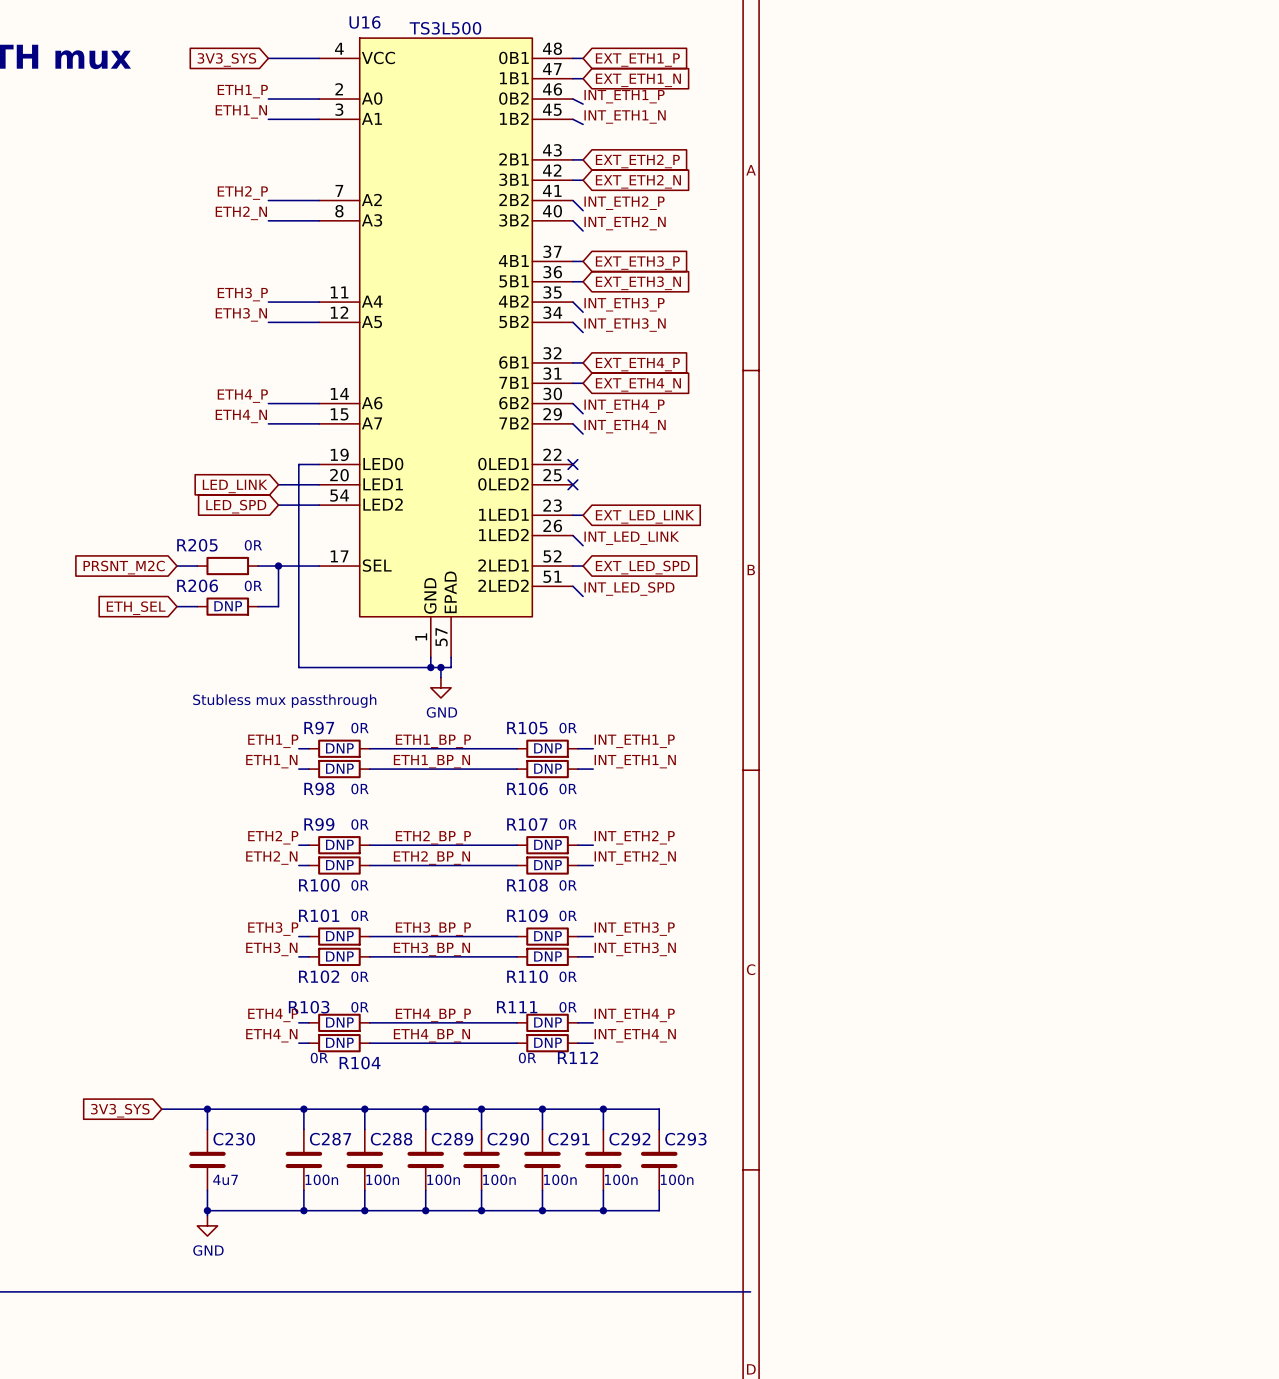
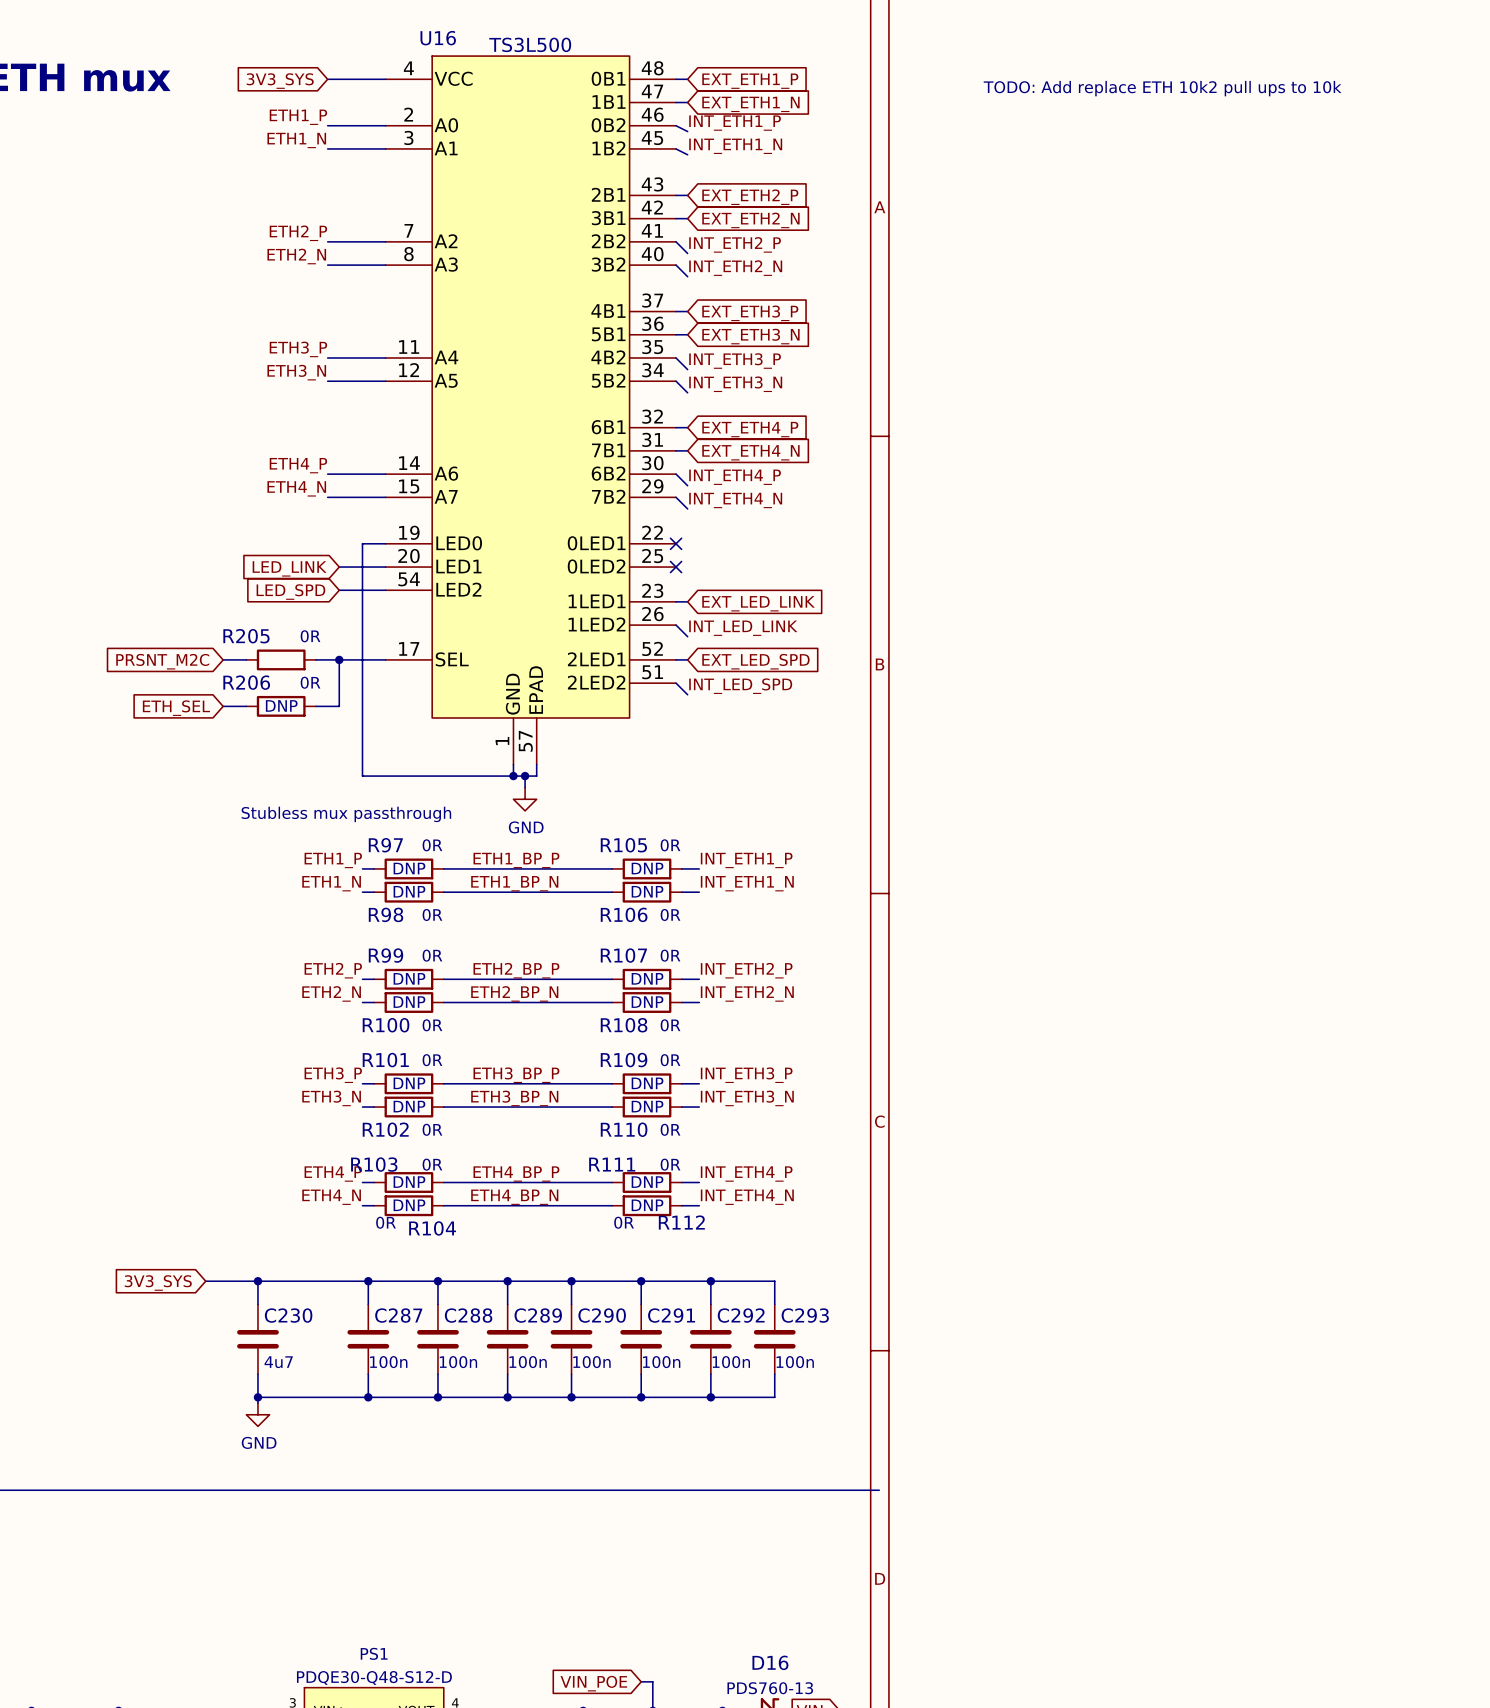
text: none -> TODO: Add replace ETH 10k2 pull ups to 10k (1162, 88)

